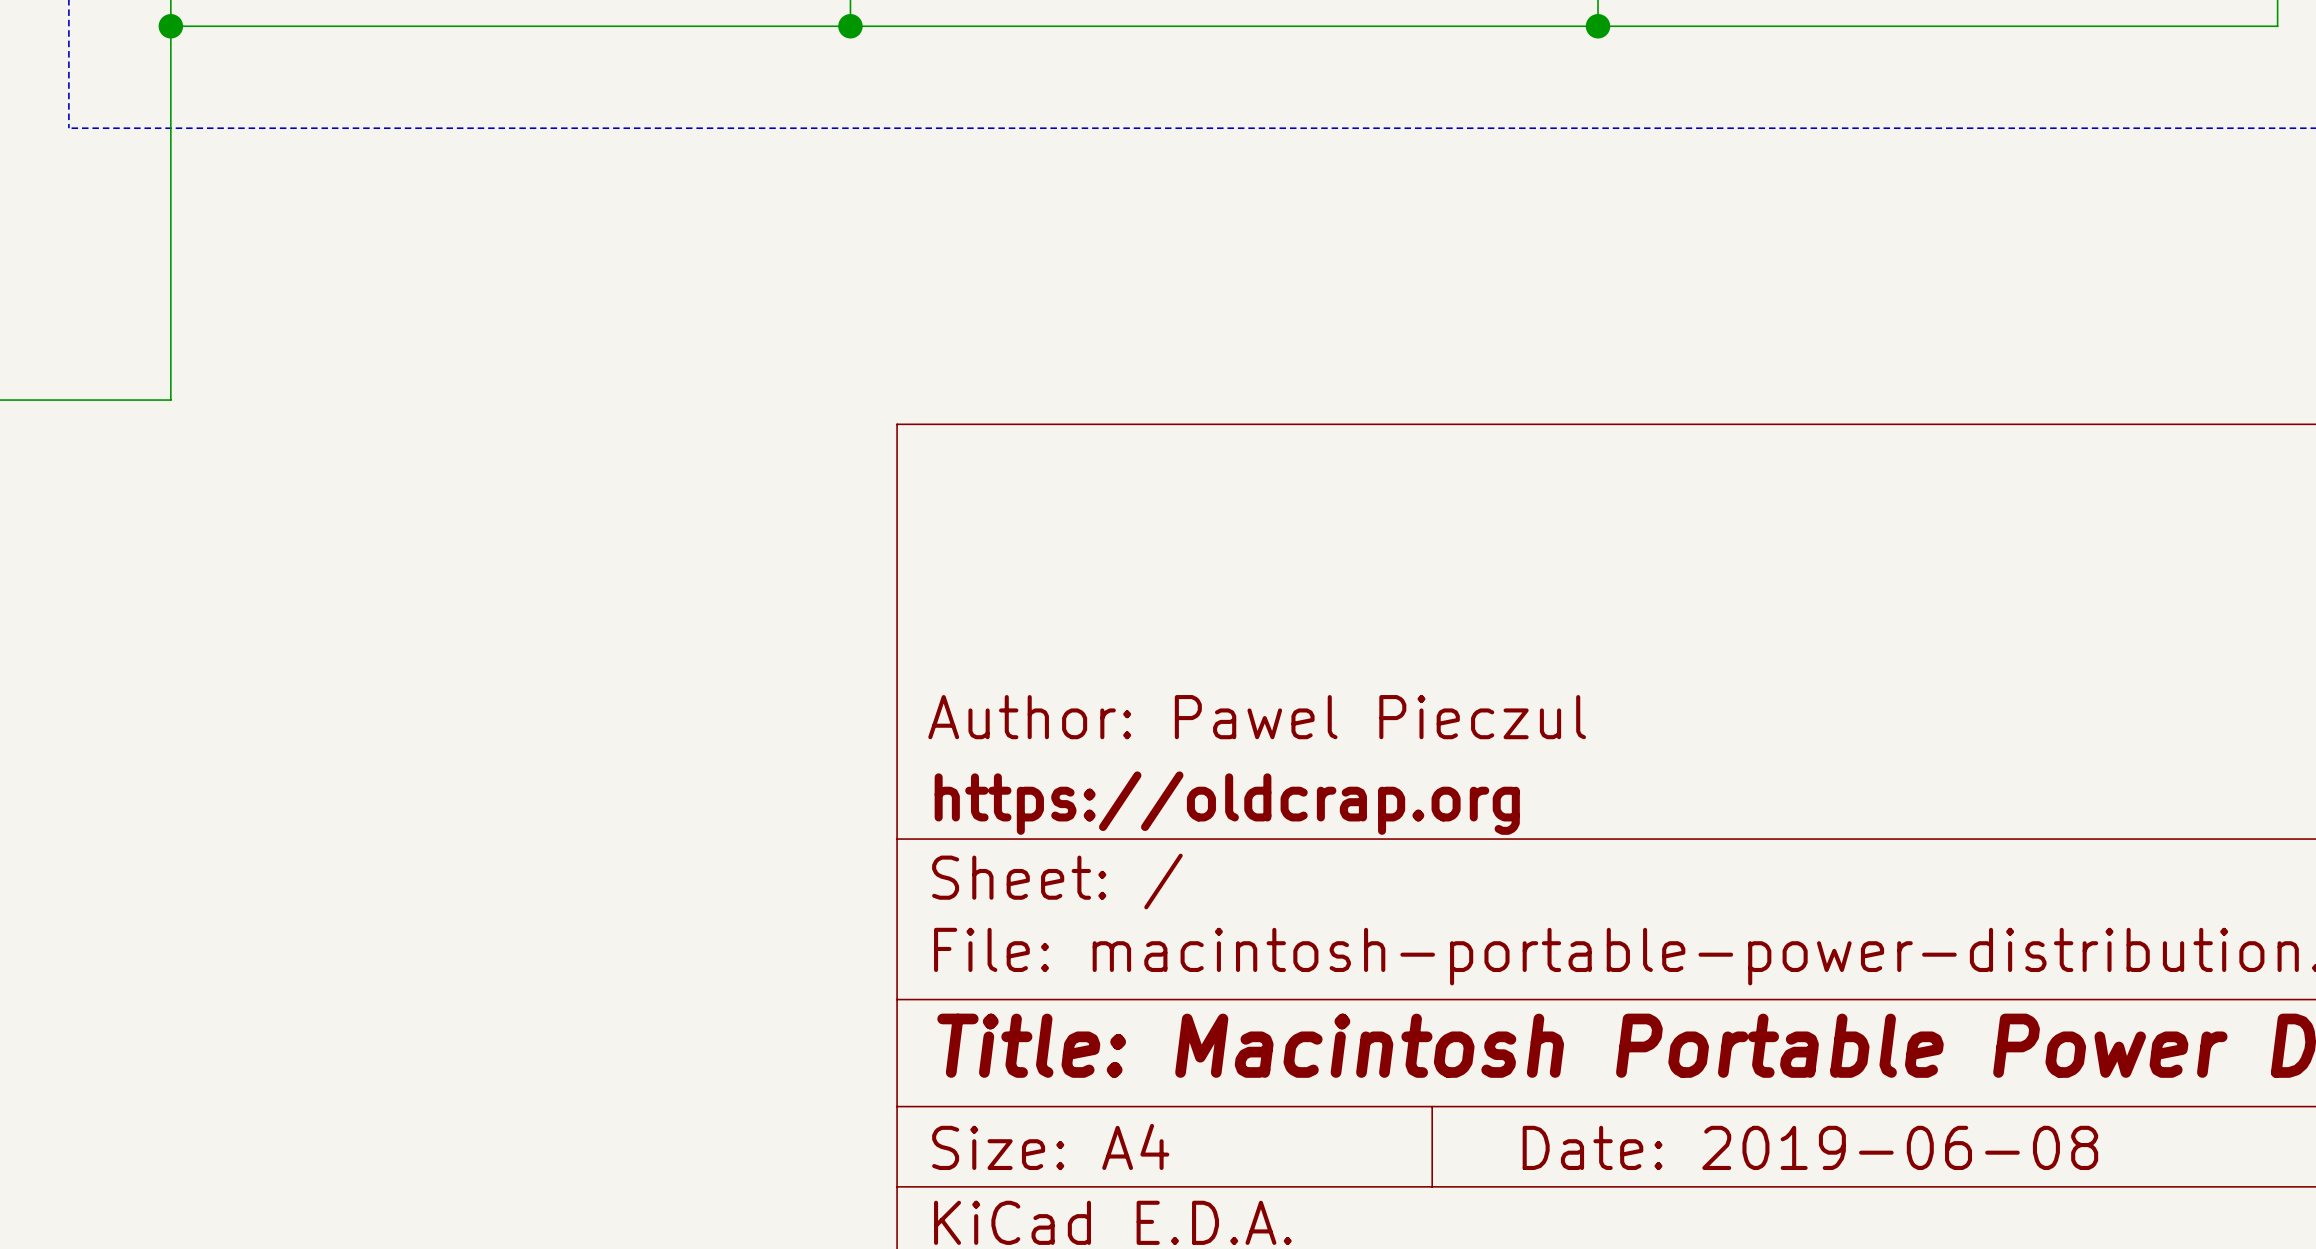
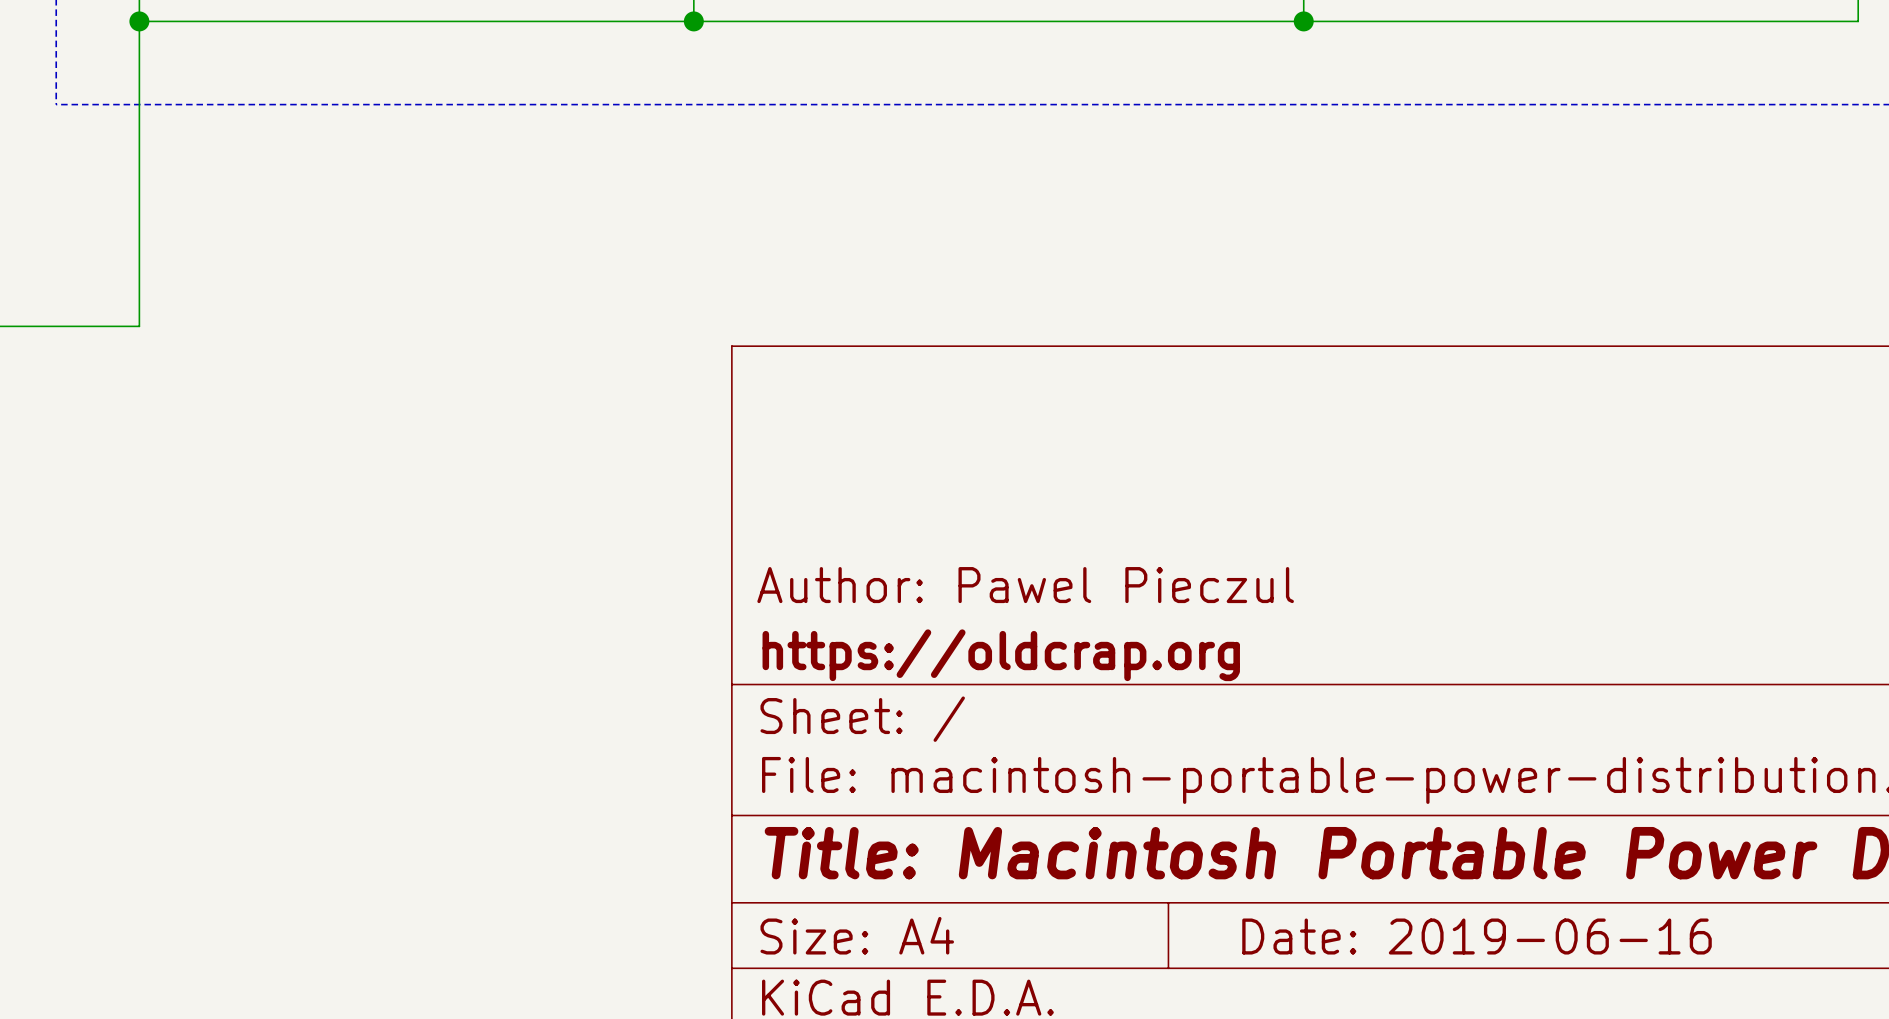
title block: Date: 2019-06-08 (1810, 1147) -> Date: 2019-06-16 (1477, 936)

